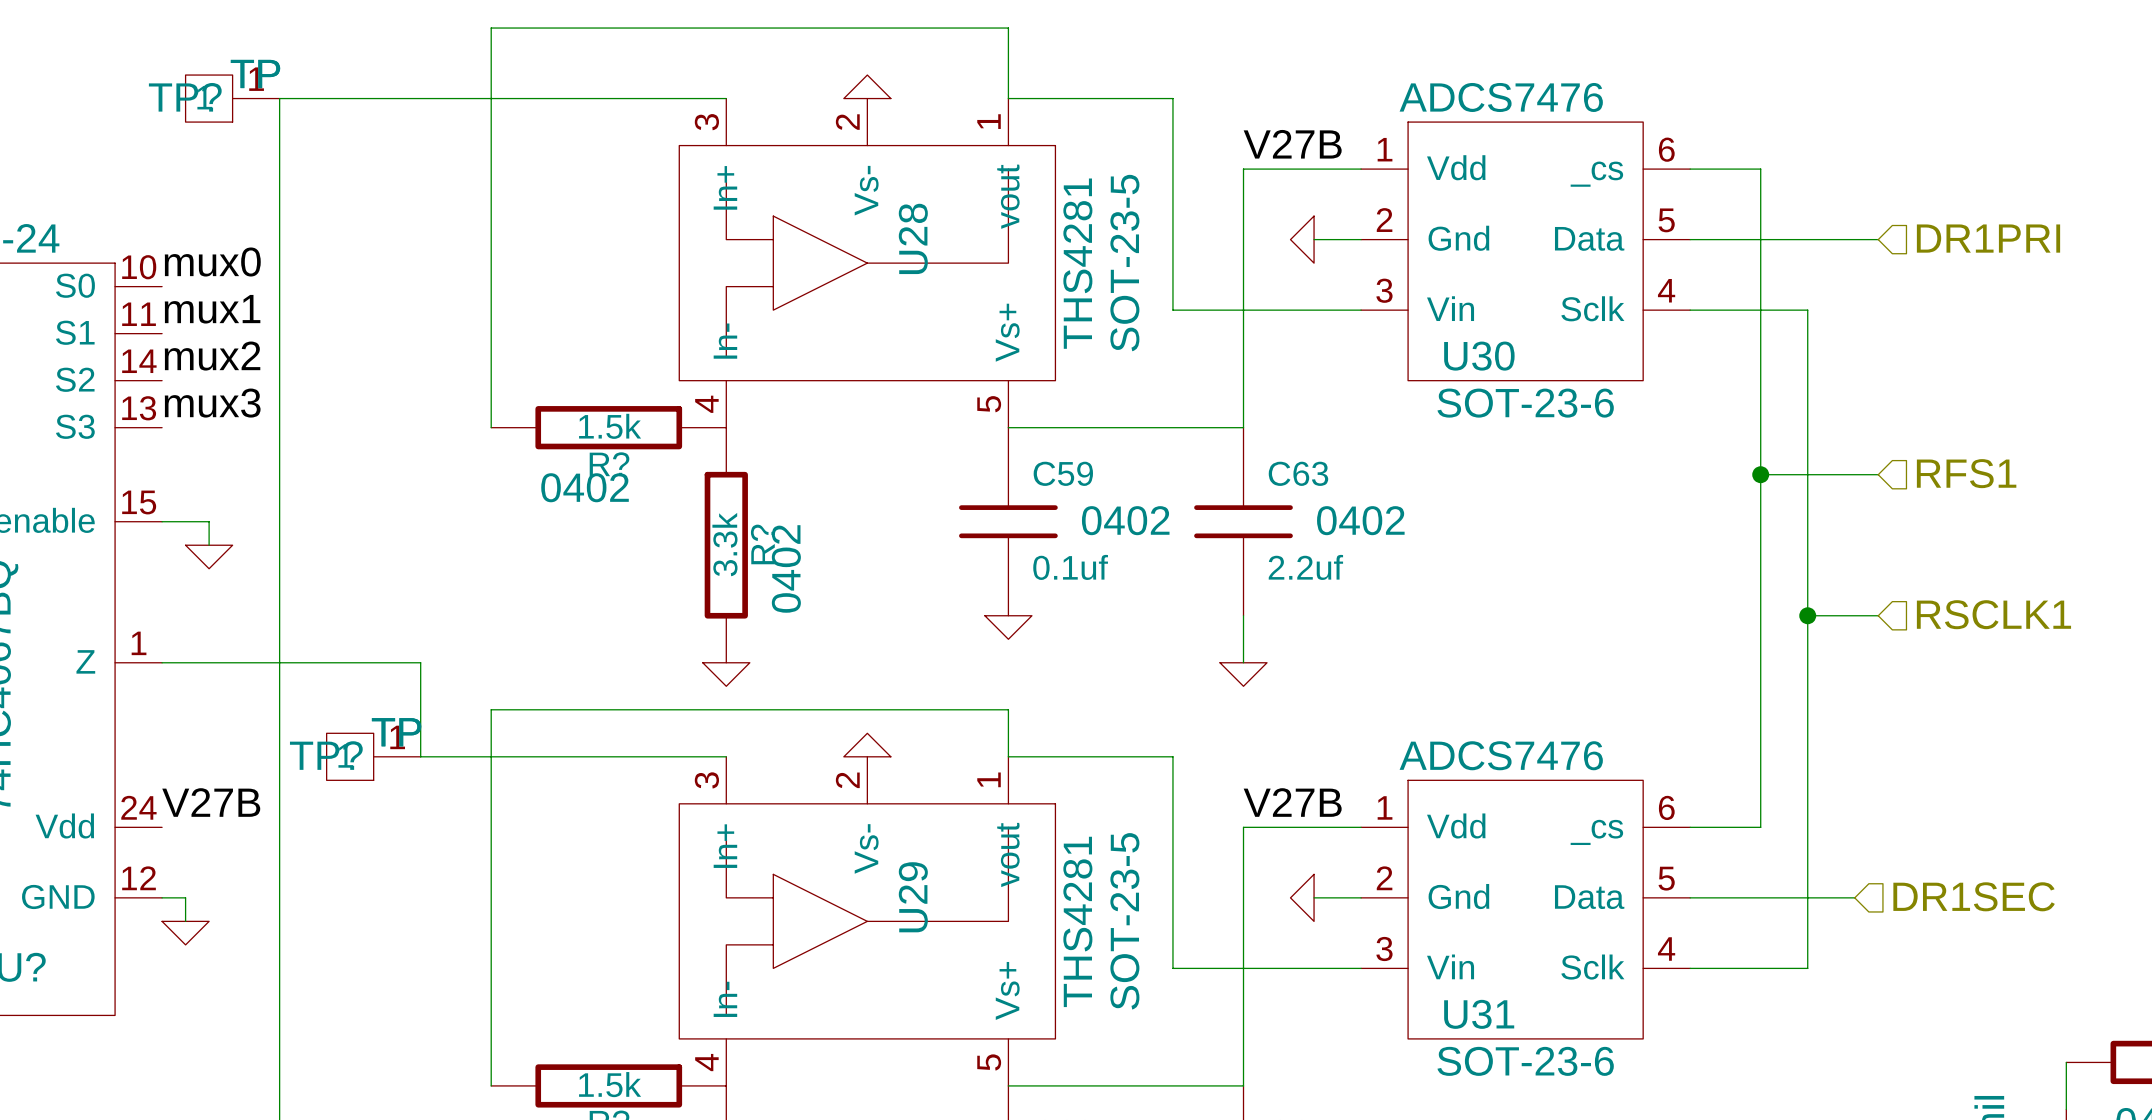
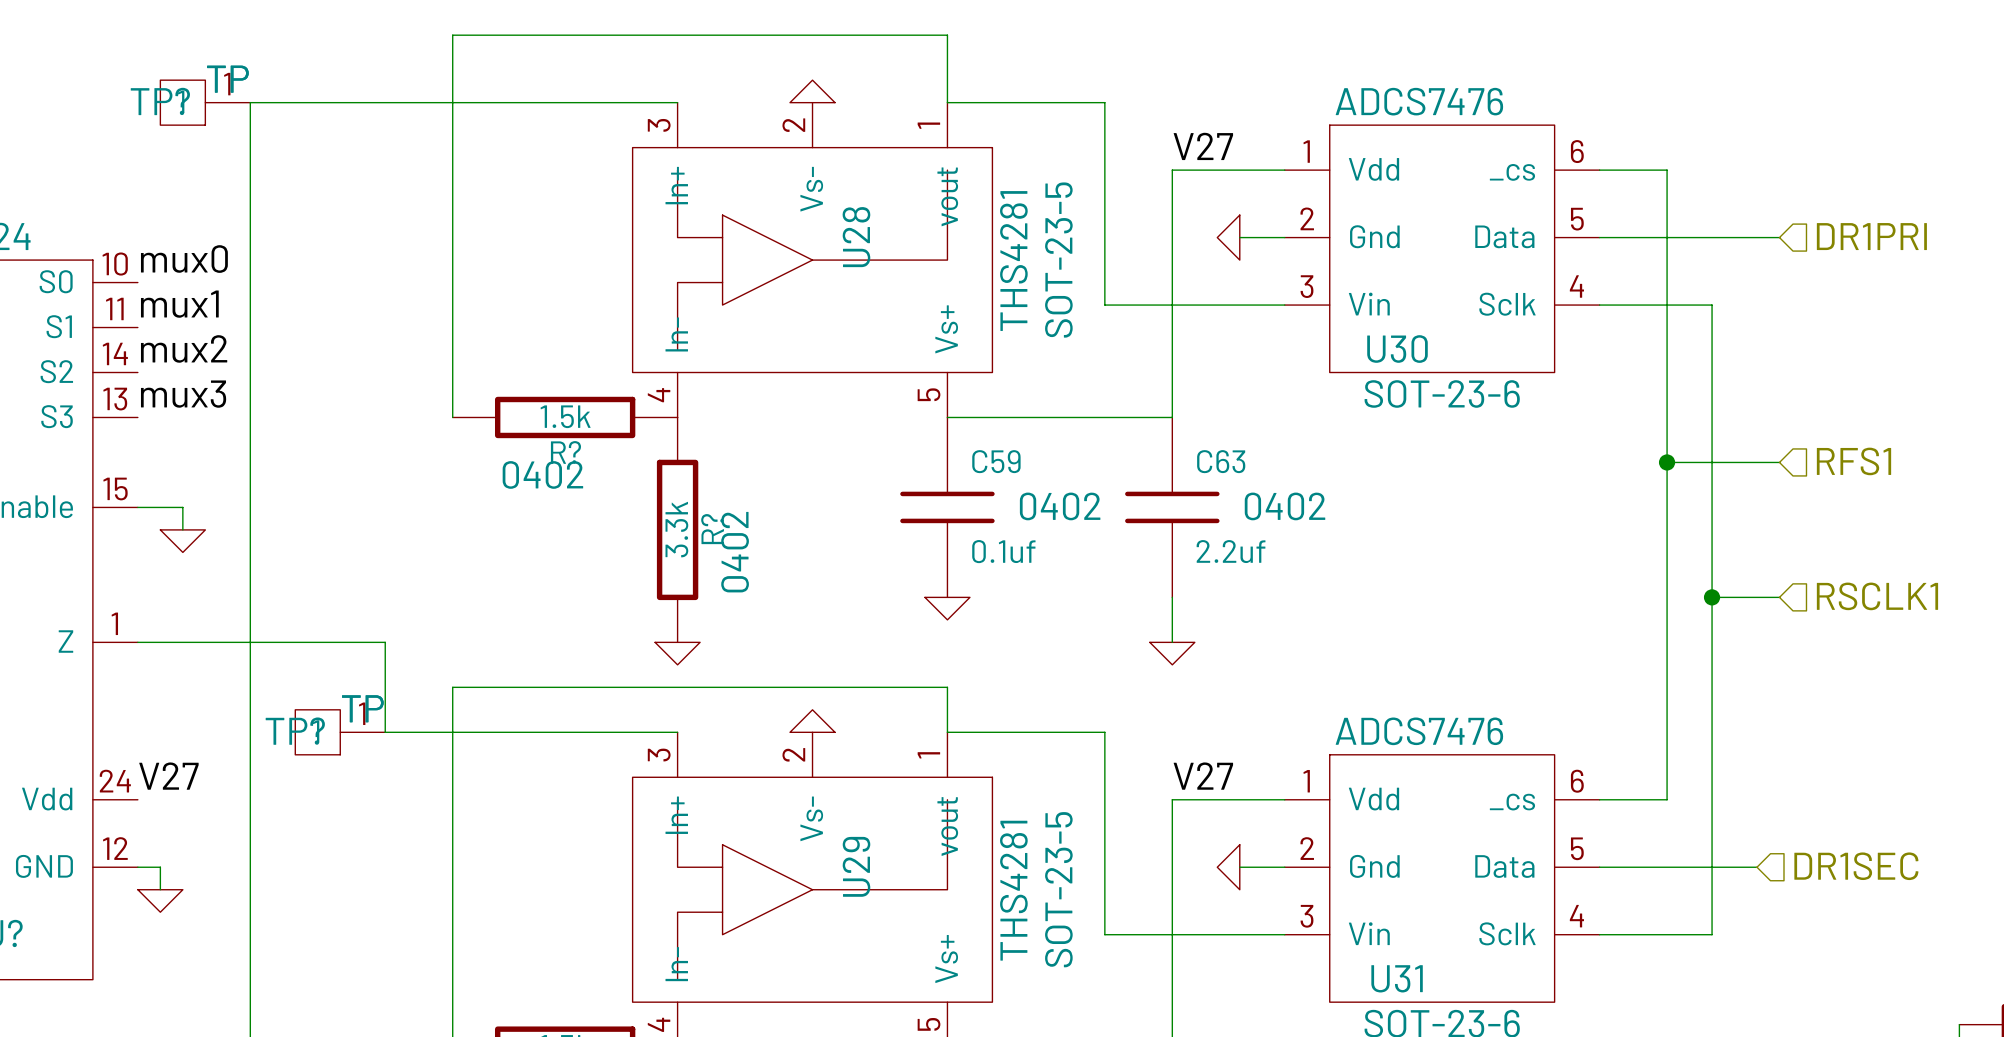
label: V27B (1292, 144) -> V27 (1203, 146)
label: V27B (211, 802) -> V27 (168, 776)
label: V27B (1292, 802) -> V27 (1203, 776)

